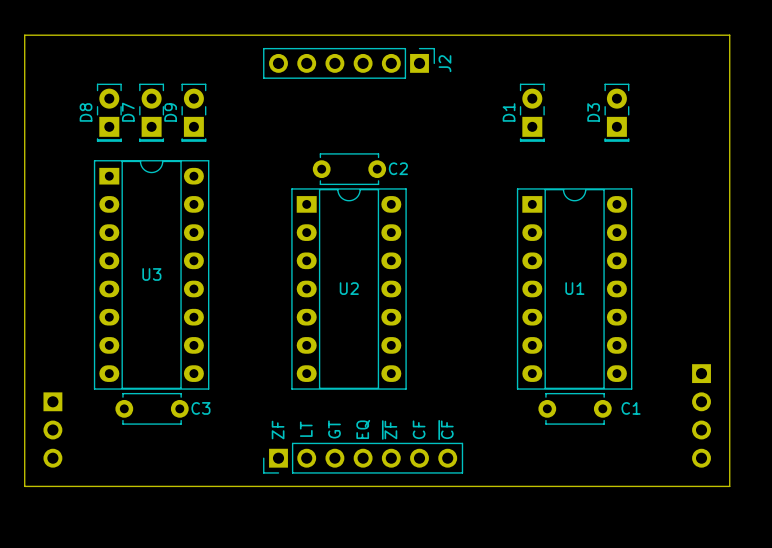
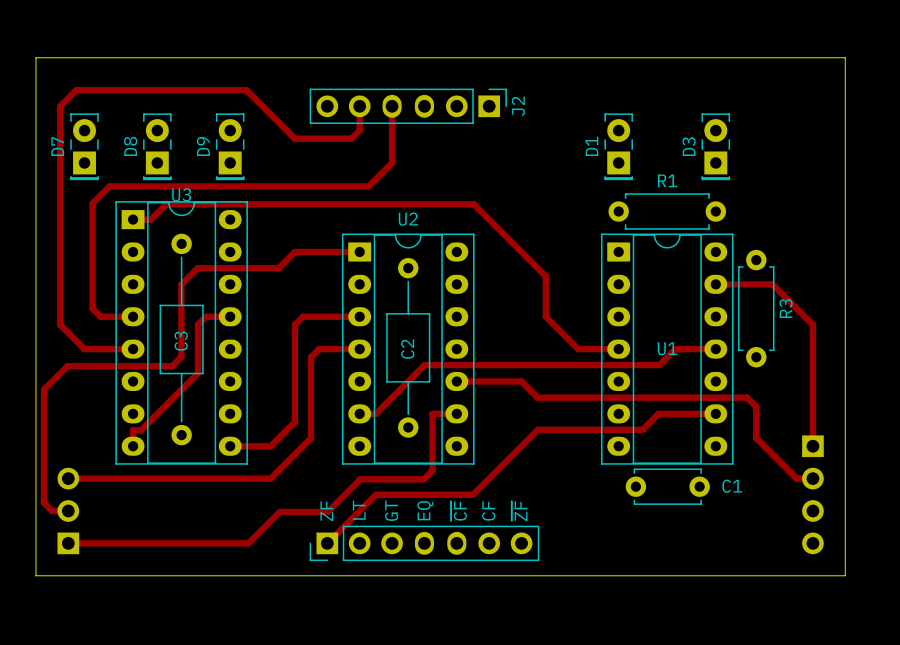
J2 footprint: [263, 47, 435, 79] -> [309, 88, 507, 125]
track: none -> (359, 106) (359, 130) (351, 138) (294, 138) (246, 90) (76, 90) (60, 106) (60, 324) (84, 349) (133, 349)
track: none -> (392, 106) (392, 162) (368, 186) (109, 186) (92, 203) (92, 308) (100, 316) (133, 316)
D8 position: (109, 112) -> (157, 146)
D7 position: (151, 112) -> (84, 146)
C2 footprint: [312, 153, 387, 186] -> [386, 257, 431, 438]
C2 name position: C2 (398, 168) -> C2 (407, 349)
R1: none -> (667, 211)
track: none -> (133, 219) (150, 219) (166, 204) (473, 204) (545, 276) (545, 316) (578, 349) (618, 349)
track: none -> (359, 251) (294, 251) (278, 268) (197, 268) (181, 284) (181, 356) (172, 366) (67, 366) (44, 389) (44, 502) (52, 510) (68, 510)
track: none -> (715, 284) (772, 284) (812, 324) (812, 446)
R3: none -> (756, 308)
track: none -> (230, 316) (205, 316) (198, 324) (198, 373) (141, 430) (133, 430) (133, 446)
track: none -> (359, 316) (303, 316) (294, 324) (294, 421) (270, 446) (230, 446)
U3 name position: U3 (151, 274) -> U3 (181, 194)
U2 name position: U2 (349, 288) -> U2 (408, 219)
track: none -> (359, 349) (319, 349) (310, 357) (310, 438) (270, 478) (68, 478)
track: none -> (715, 349) (675, 349) (659, 365) (424, 365) (375, 413) (359, 413)
track: none -> (456, 381) (521, 381) (537, 397) (747, 397) (756, 406) (756, 438) (796, 478) (812, 478)
track: none -> (456, 413) (432, 413) (432, 470) (423, 479) (360, 479) (327, 512) (279, 512) (248, 543) (68, 543)
track: none -> (715, 413) (658, 413) (642, 429) (538, 429) (473, 494) (375, 494) (327, 543)
C3 footprint: [115, 392, 189, 425] -> [159, 233, 204, 446]
C3 name position: C3 (200, 408) -> C3 (181, 341)
part rotation: 0° (52, 430) -> 180° (68, 510)
text: ~{ZF} (389, 430) -> ~{CF} (459, 510)
text: ~{CF} (446, 430) -> ~{ZF} (519, 511)
part footprint: [263, 442, 464, 474] -> [309, 525, 540, 562]

